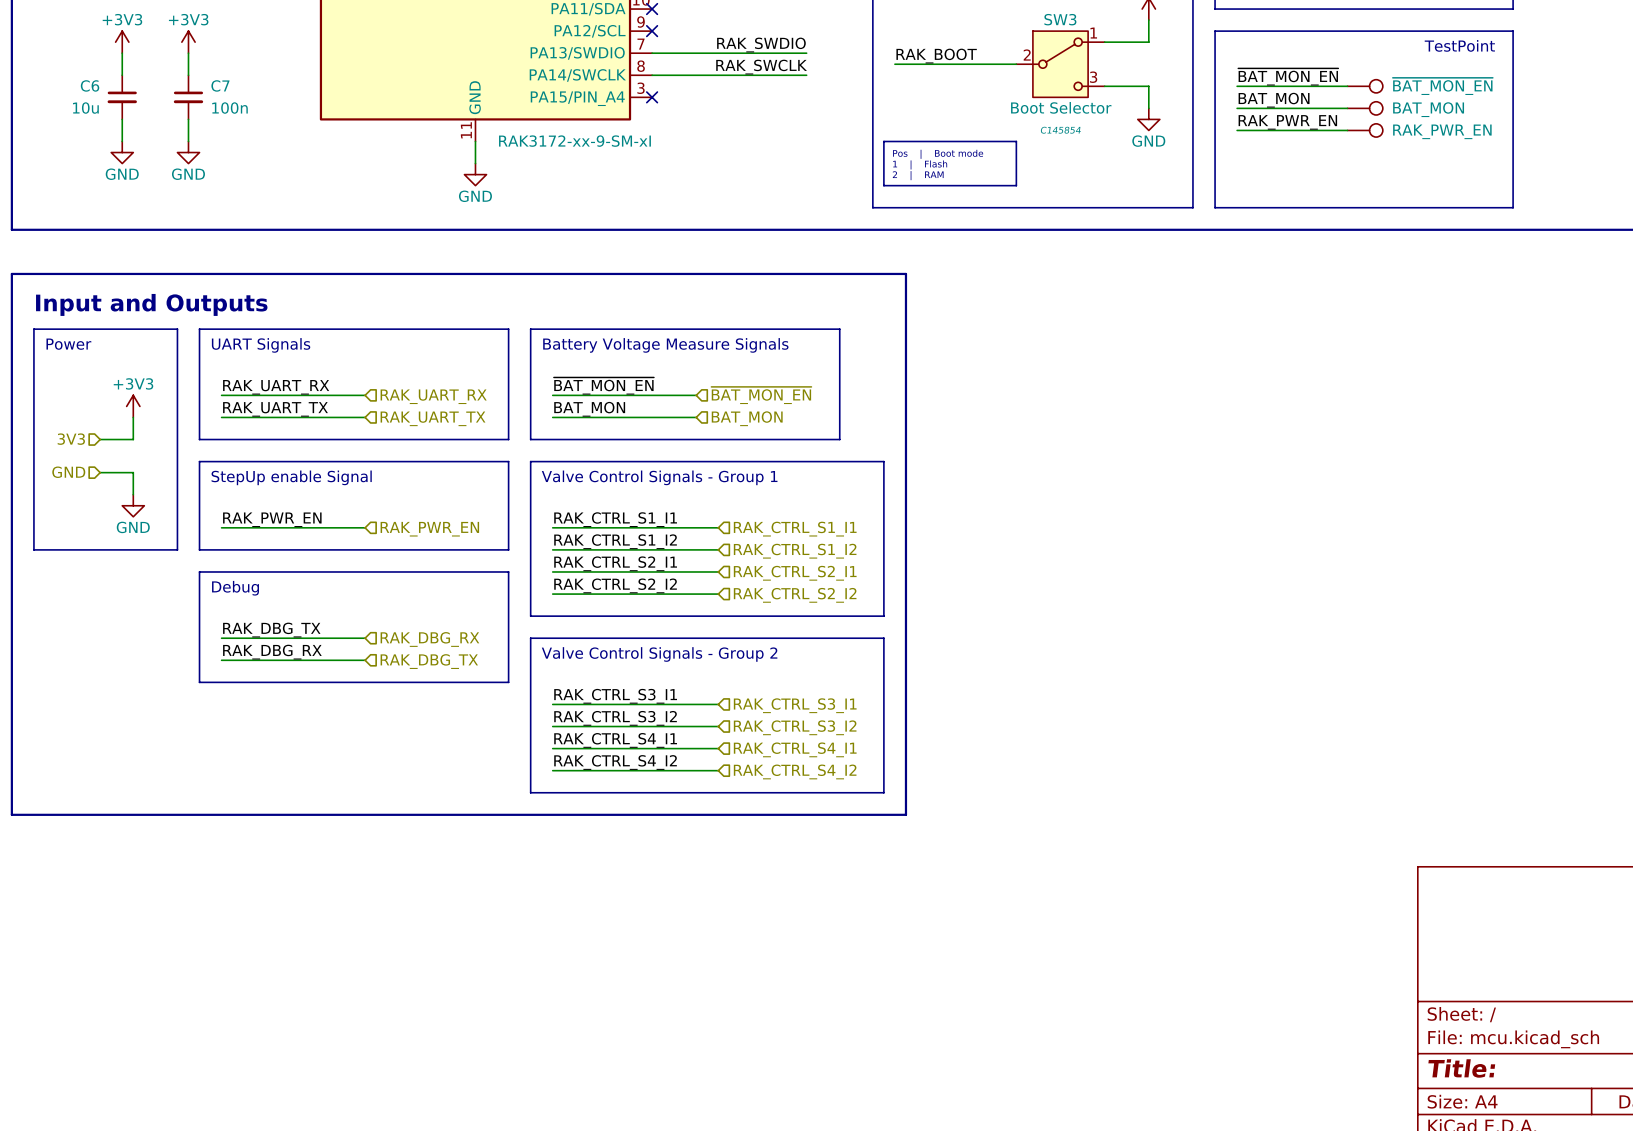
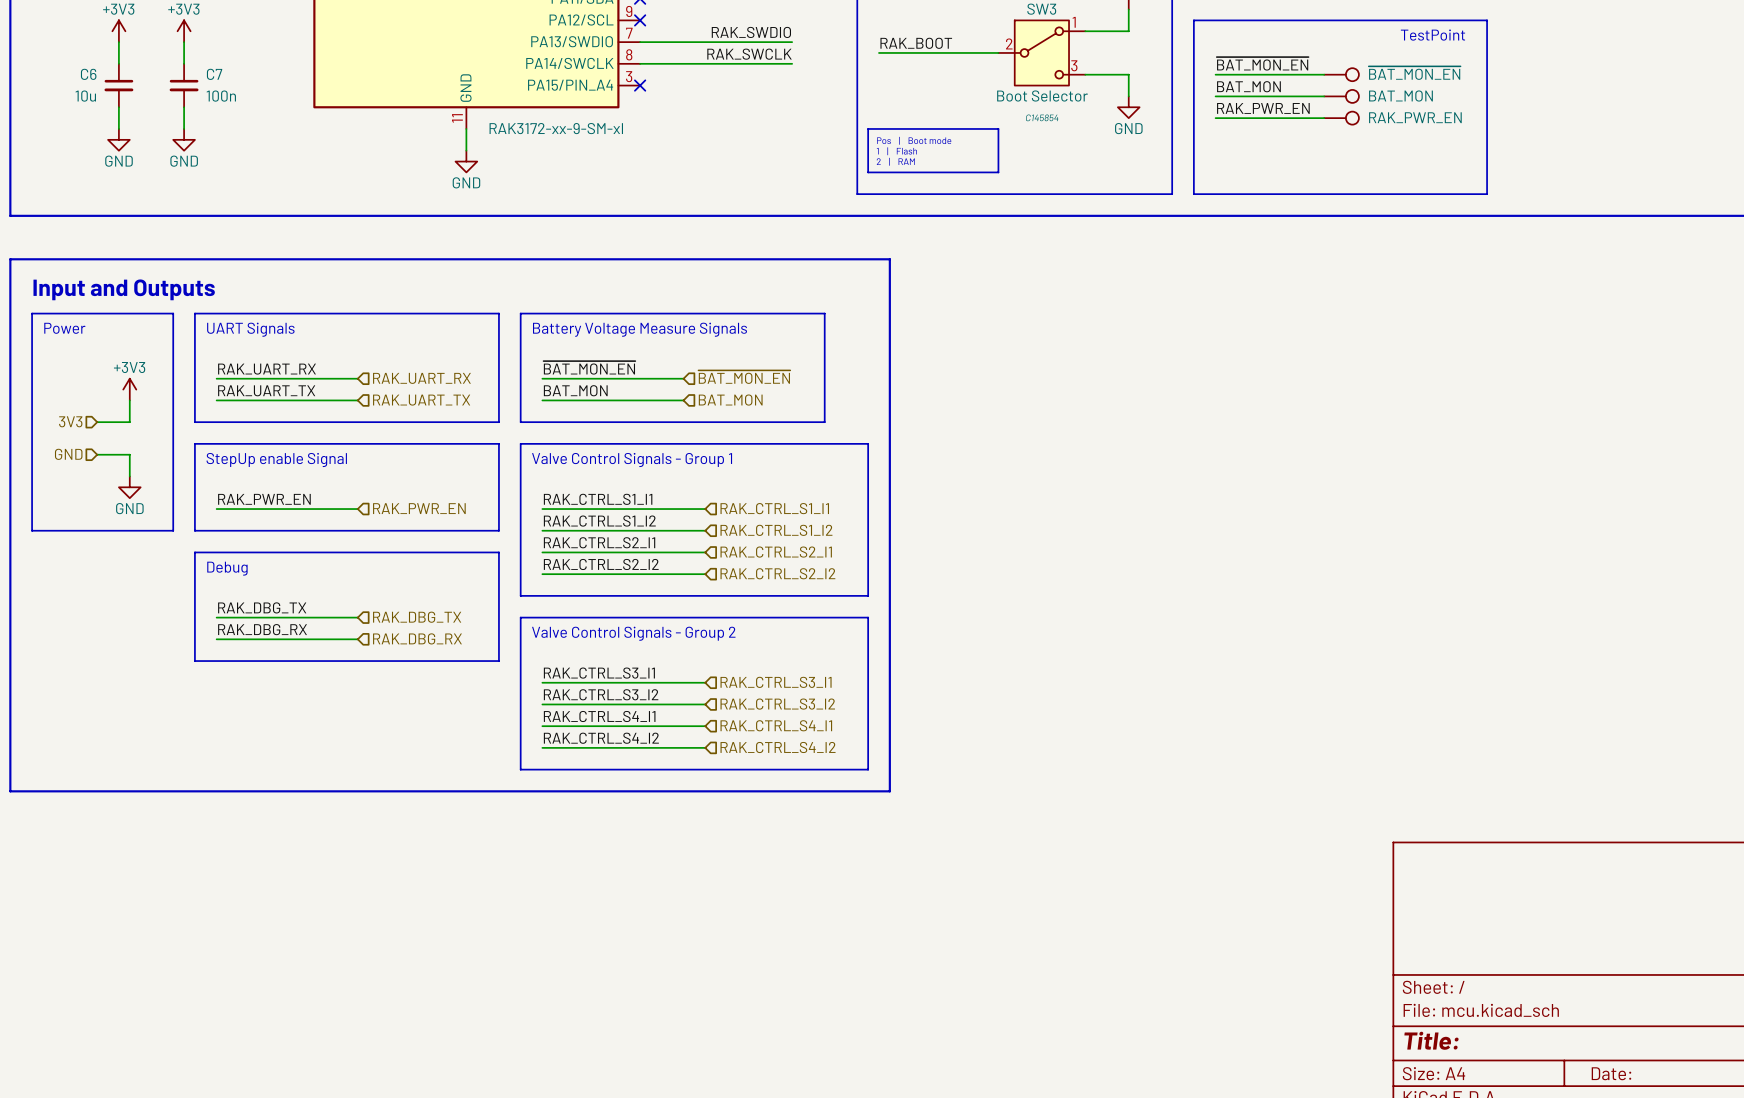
hierarchical label: RAK_DBG_RX (429, 639) -> RAK_DBG_TX (417, 617)
hierarchical label: RAK_DBG_TX (429, 661) -> RAK_DBG_RX (417, 638)

